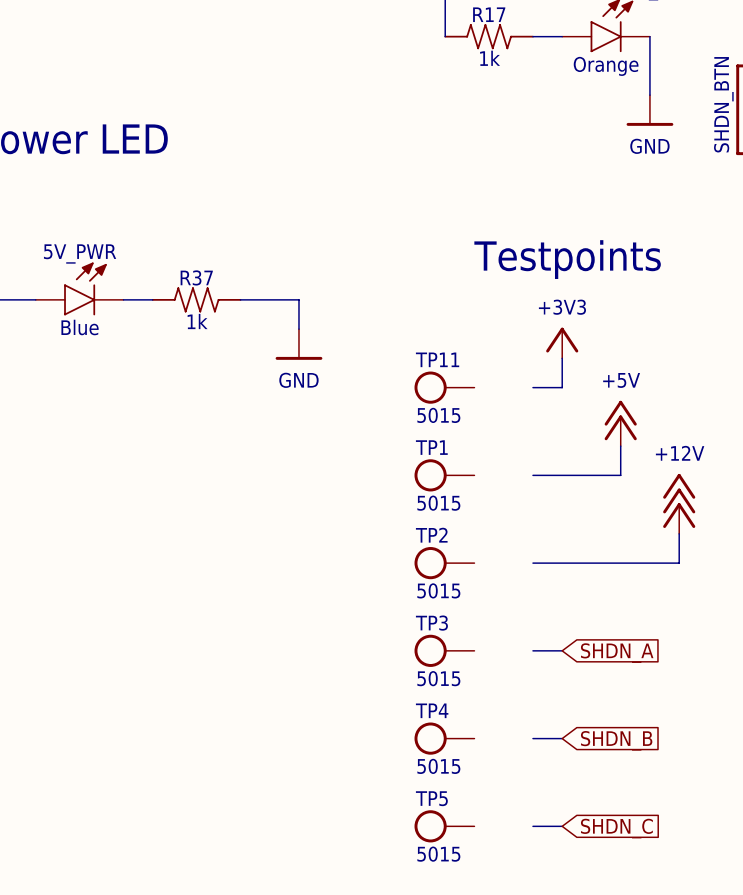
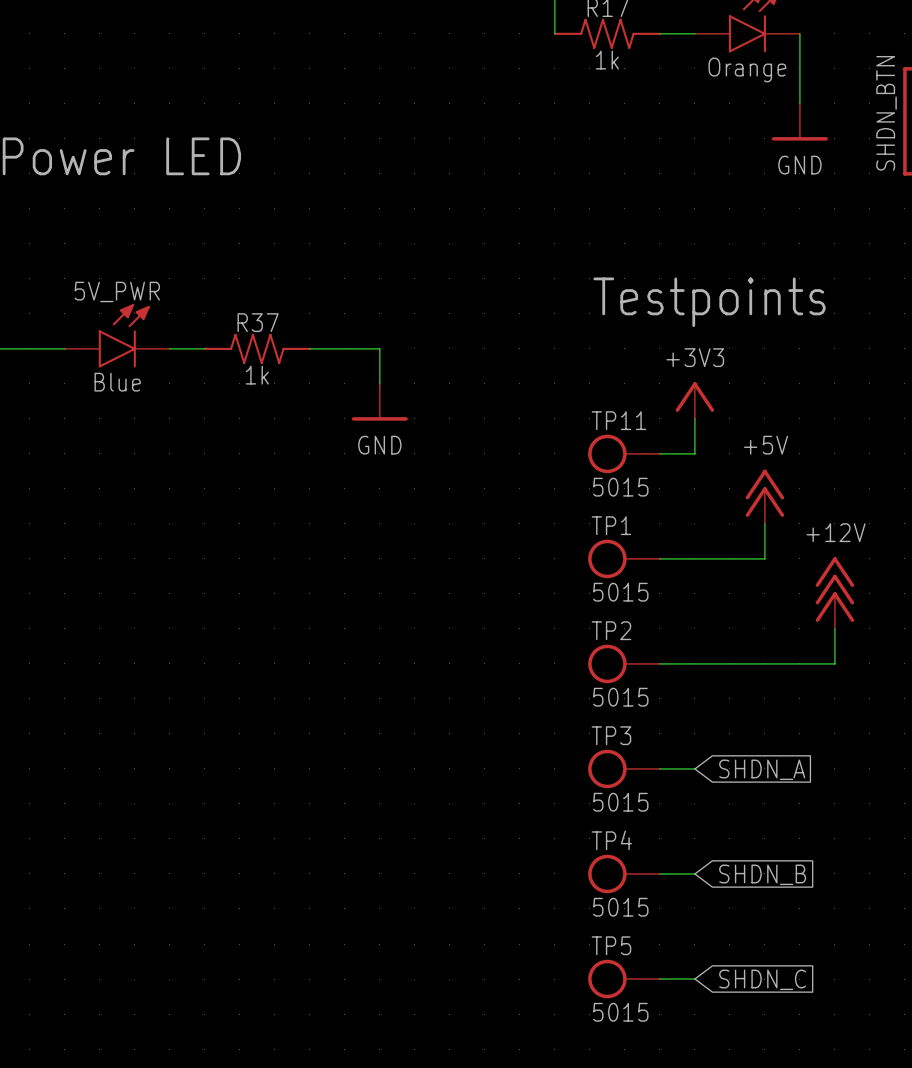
TP11 position: (444, 387) -> (624, 453)
TP1 position: (444, 475) -> (624, 558)
TP2 position: (444, 563) -> (624, 663)
TP3 position: (444, 650) -> (624, 768)
TP4 position: (444, 738) -> (624, 873)
TP5 position: (444, 826) -> (624, 979)

